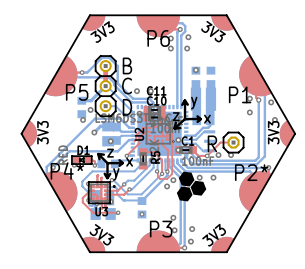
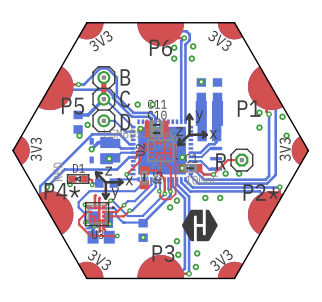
part: none -> (91, 150)
drawing: [176, 171, 207, 202] -> none
drawing: none -> [182, 209, 218, 242]

